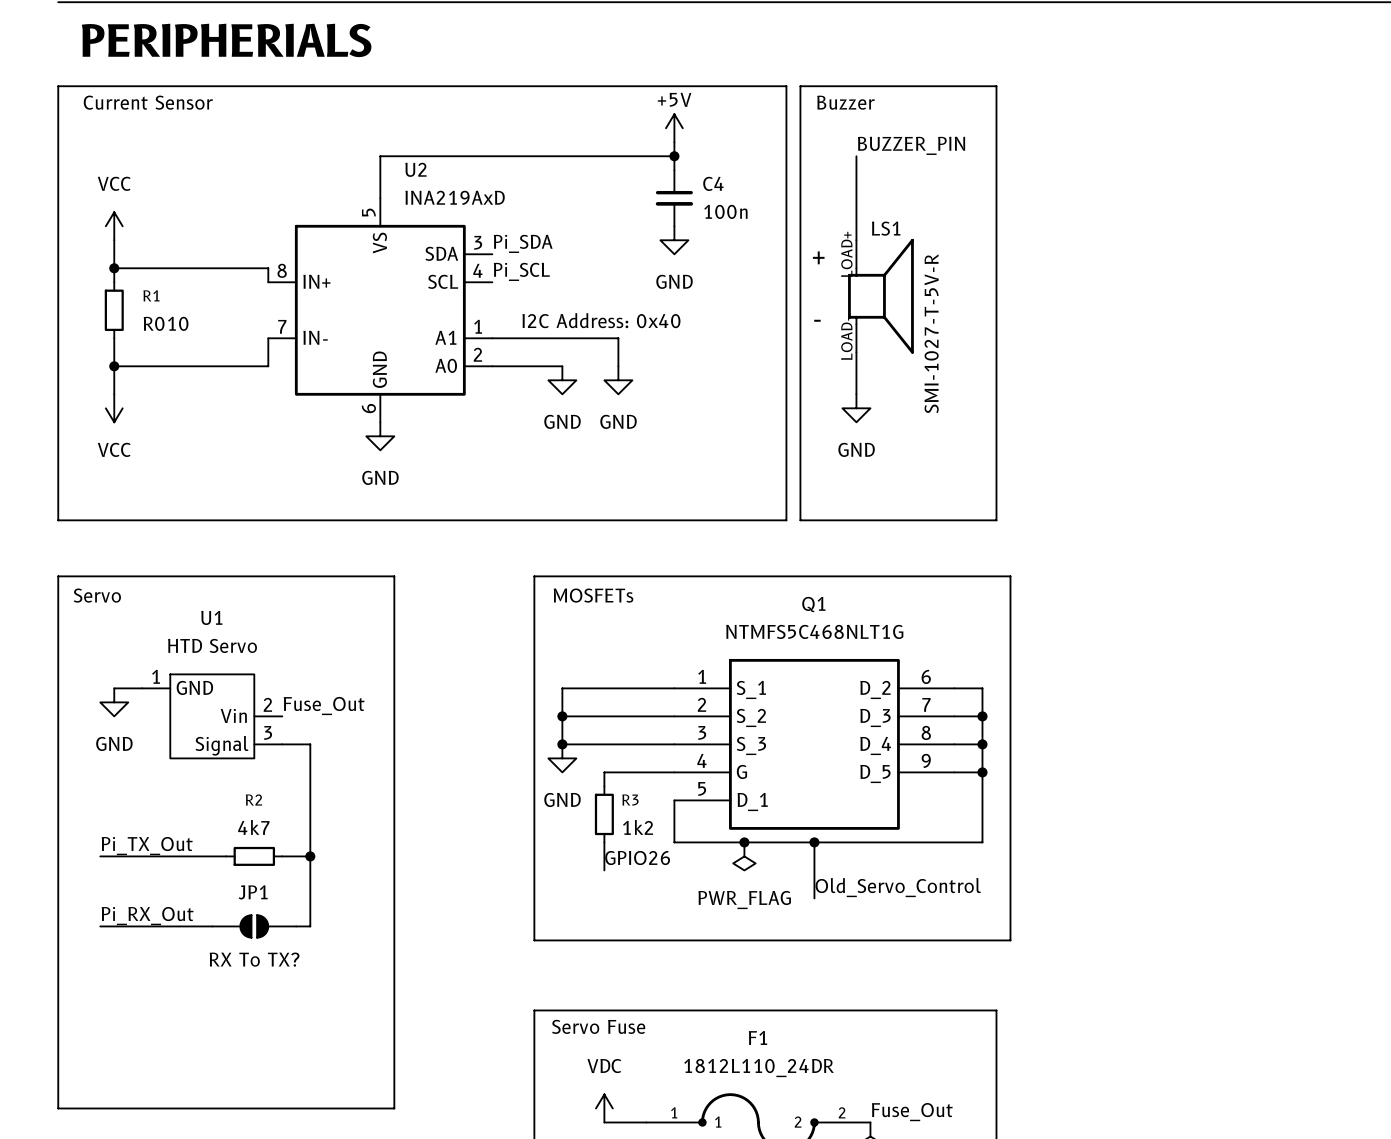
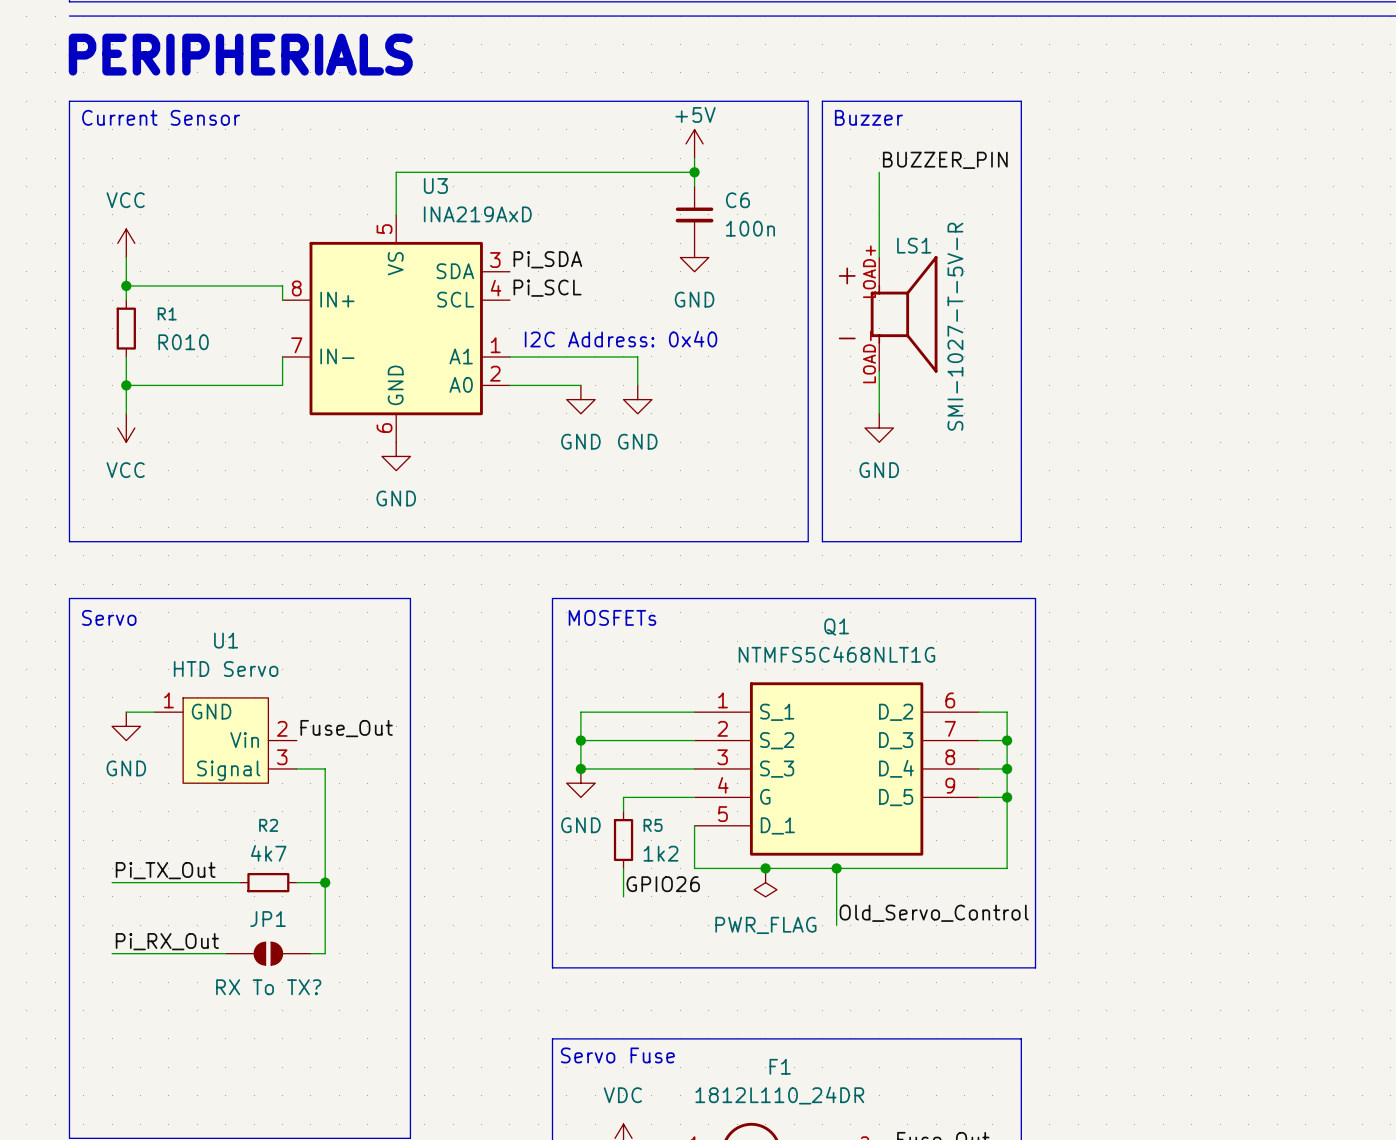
U2 name: U2 (415, 169) -> U3 (435, 185)
C4 name: C4 (713, 183) -> C6 (737, 200)
R3 name: R3 (630, 800) -> R5 (653, 825)

